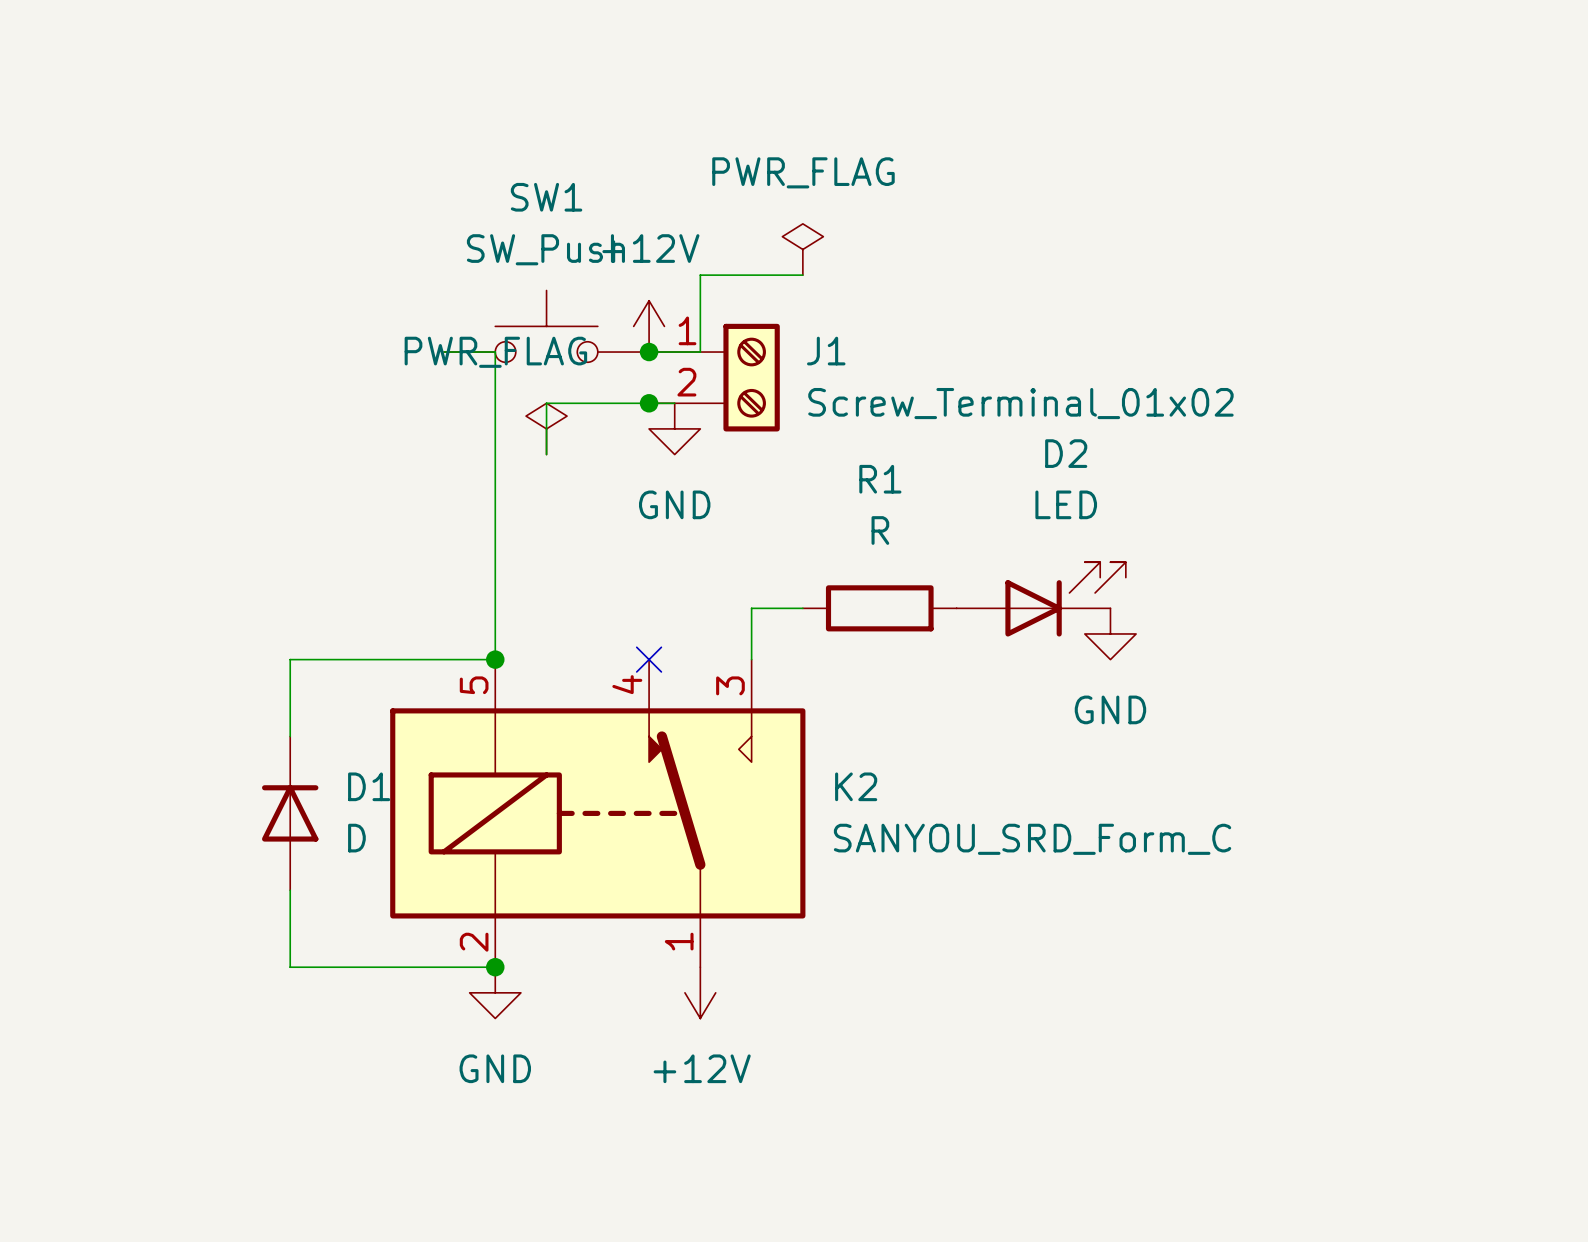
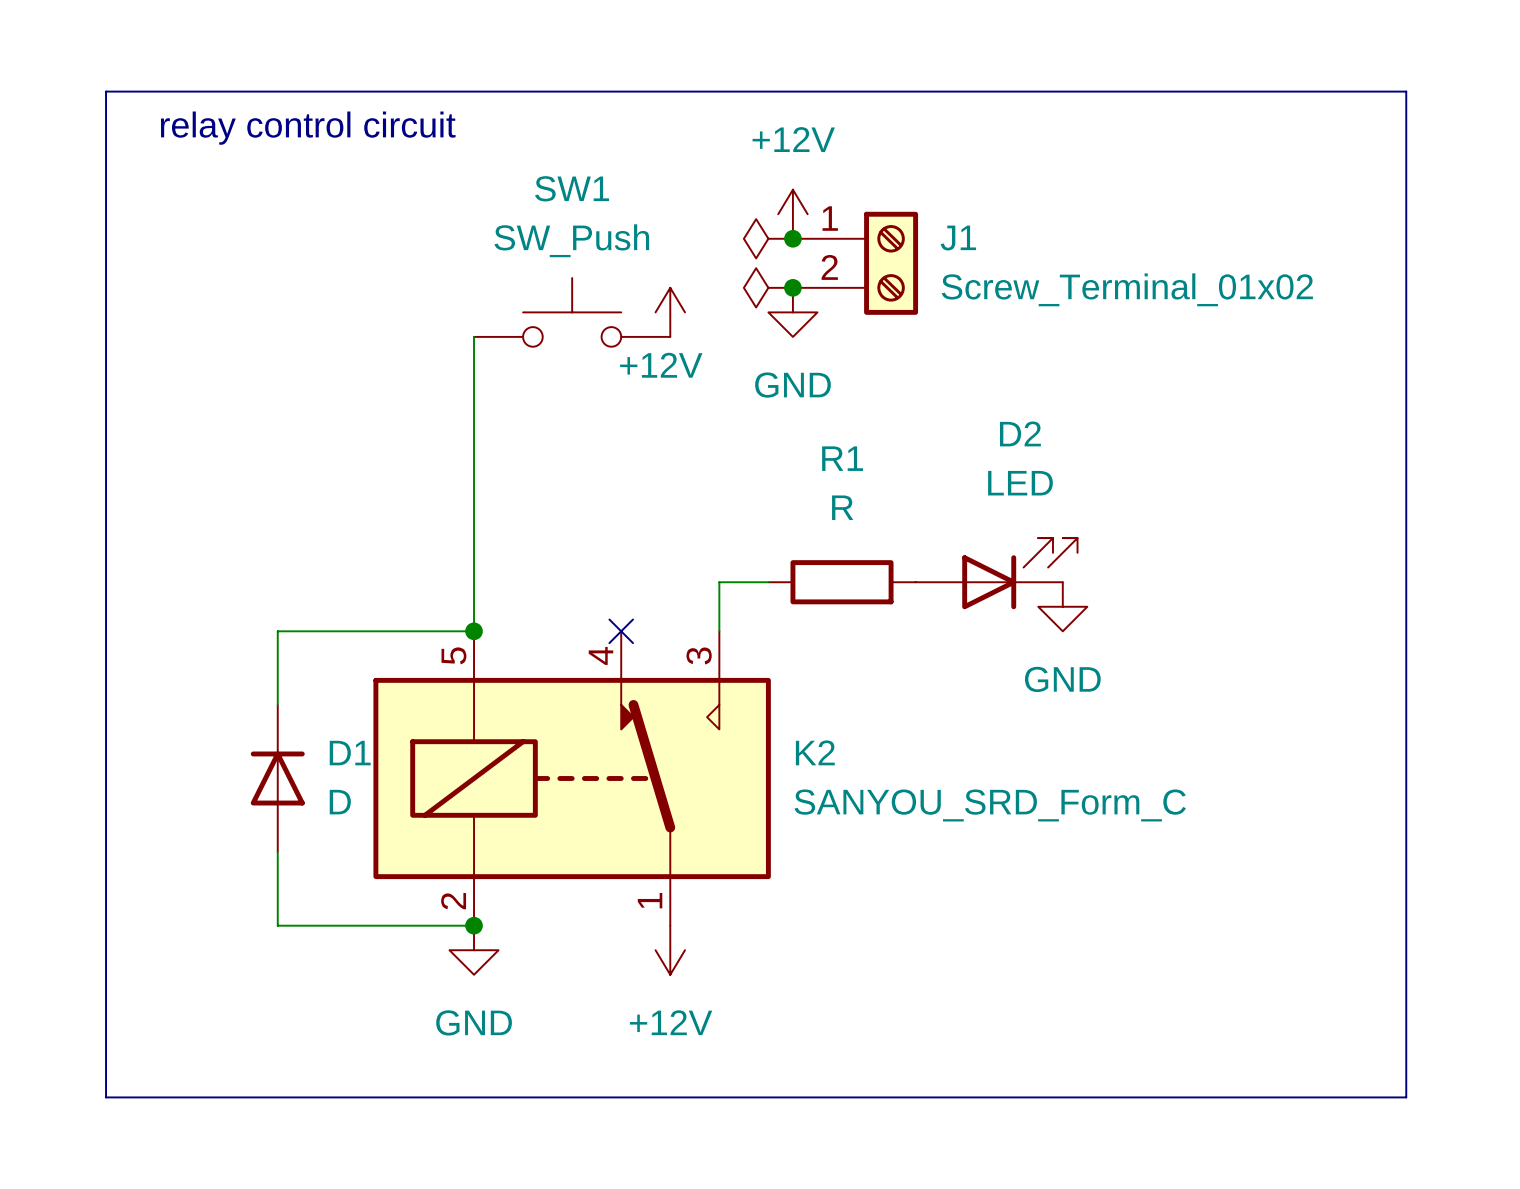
line: none -> (106, 91) (1406, 91) (1406, 1097) (106, 1097) (106, 91)
text: none -> relay control circuit (308, 128)
power symbol text: PWR_FLAG (803, 172) -> none
power symbol: none -> +12V (792, 214)
power symbol text position: +12V (650, 248) -> +12V (661, 365)
power symbol rotation: 0° (802, 249) -> 90° counterclockwise (768, 238)
junction: none -> (792, 238)
wire: (802, 275) (700, 275) (700, 352) (649, 352) -> none
power symbol: none -> (768, 287)
junction: none -> (792, 287)
SW1 position: (546, 326) -> (572, 312)
power symbol position: +12V (649, 326) -> +12V (670, 312)
wire: (444, 352) (495, 352) -> none
junction: (649, 352) -> none
J1 position: (714, 377) -> (855, 263)
junction: (649, 403) -> none
wire: (674, 403) (546, 403) (546, 454) -> none
power symbol: PWR_FLAG (546, 428) -> none
power symbol position: GND (674, 428) -> GND (792, 312)

